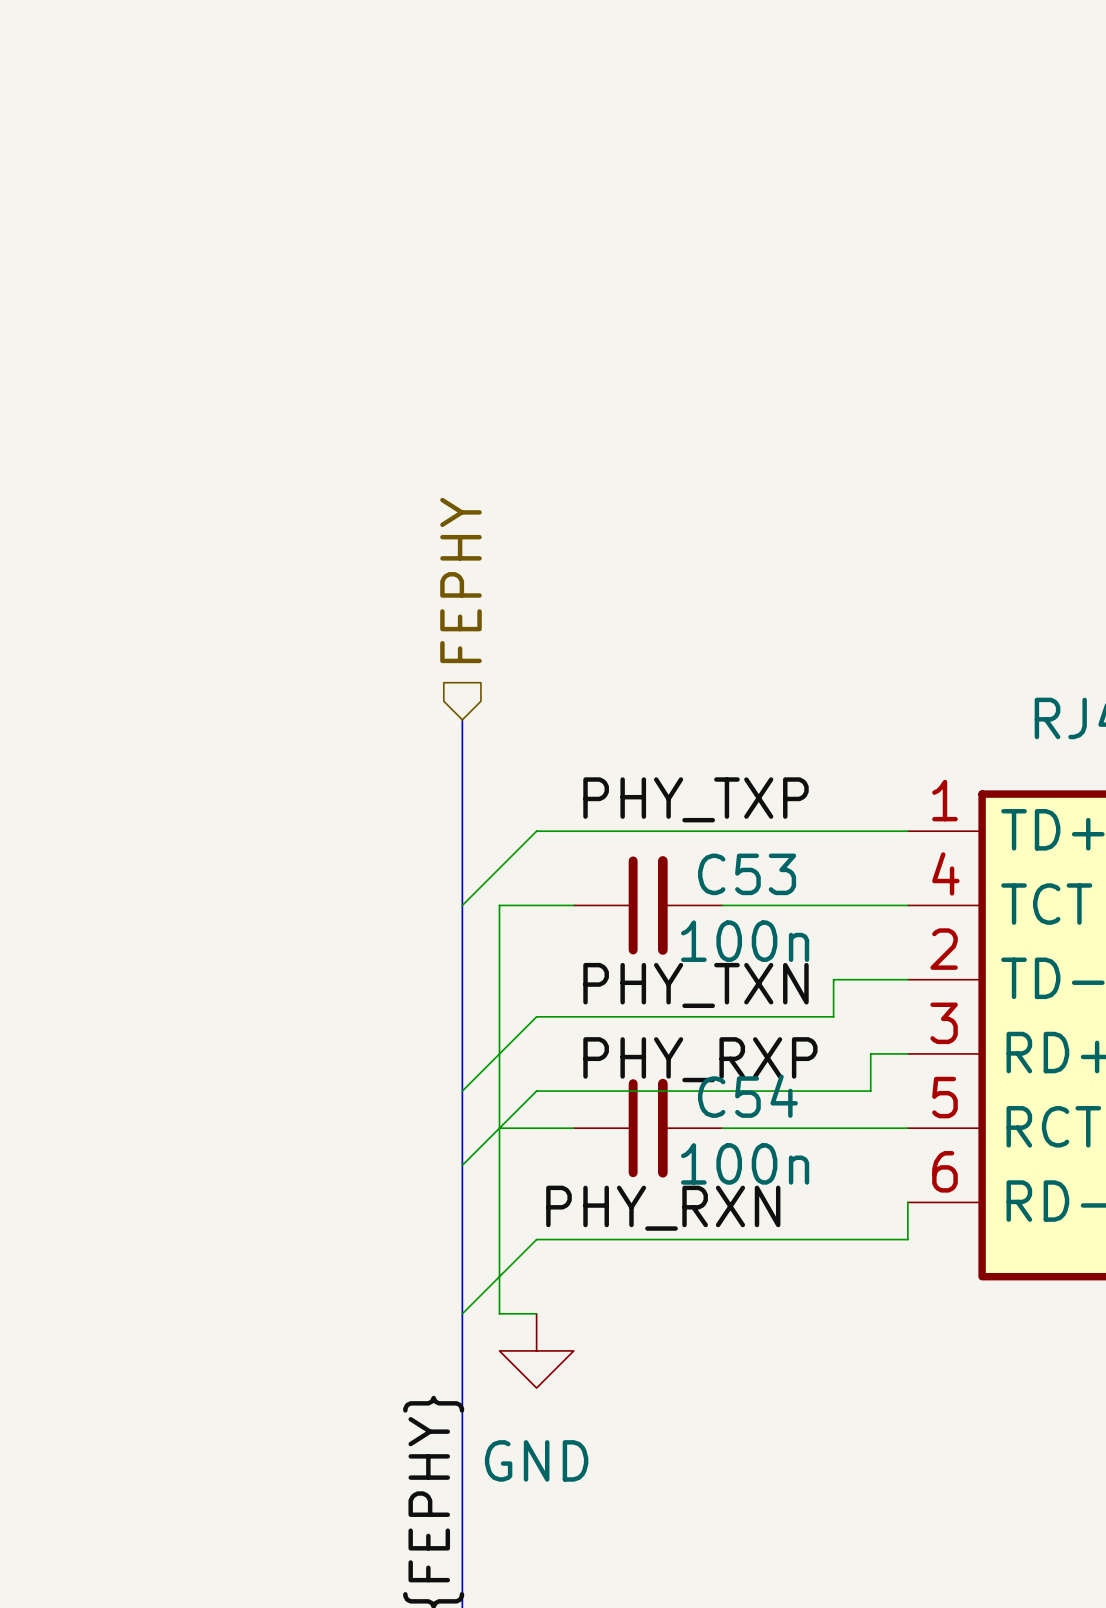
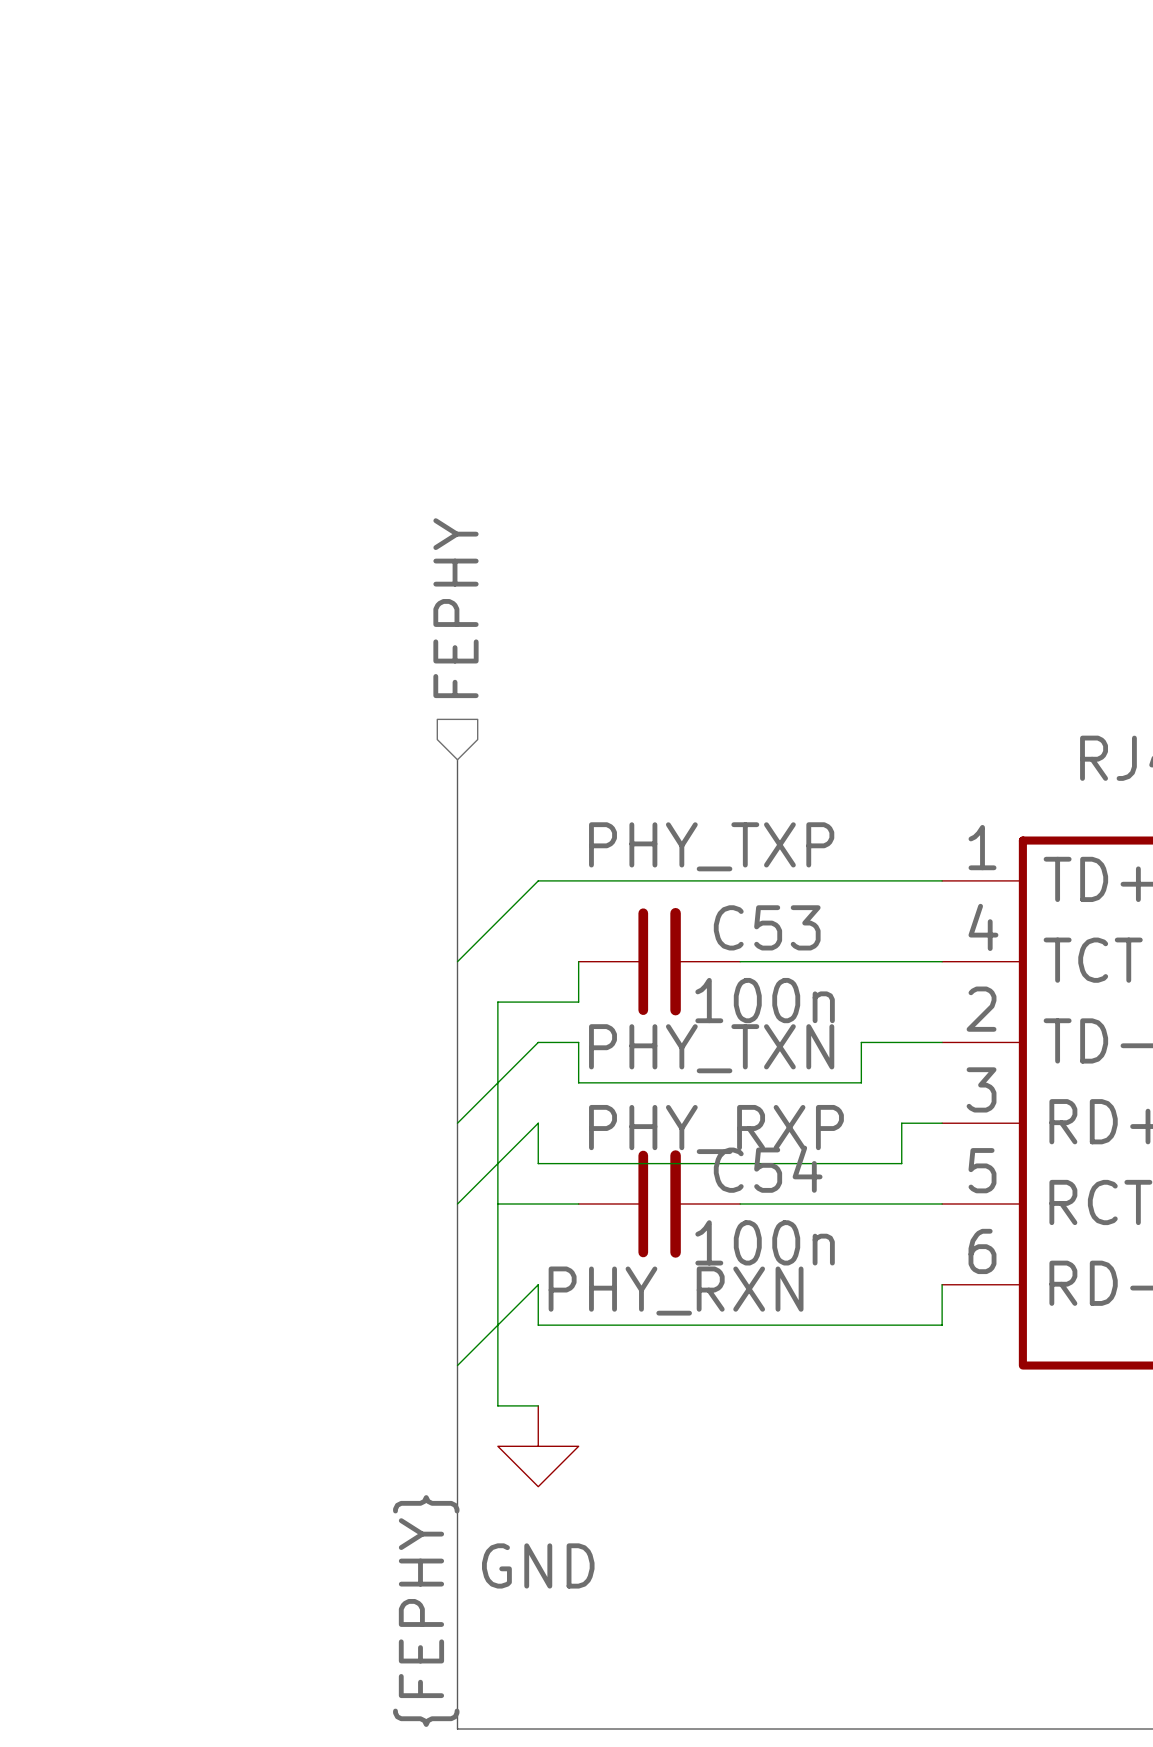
wire: (573, 905) (499, 905) (499, 942) -> (578, 961) (578, 1002) (497, 1002)
wire: (573, 1016) (536, 1016) (462, 1091) -> (578, 1082) (578, 1042) (538, 1042) (457, 1123)
wire: (536, 1091) (462, 1165) -> (538, 1163) (538, 1123) (457, 1203)
wire: (536, 1239) (462, 1313) -> (538, 1325) (538, 1284) (457, 1365)

